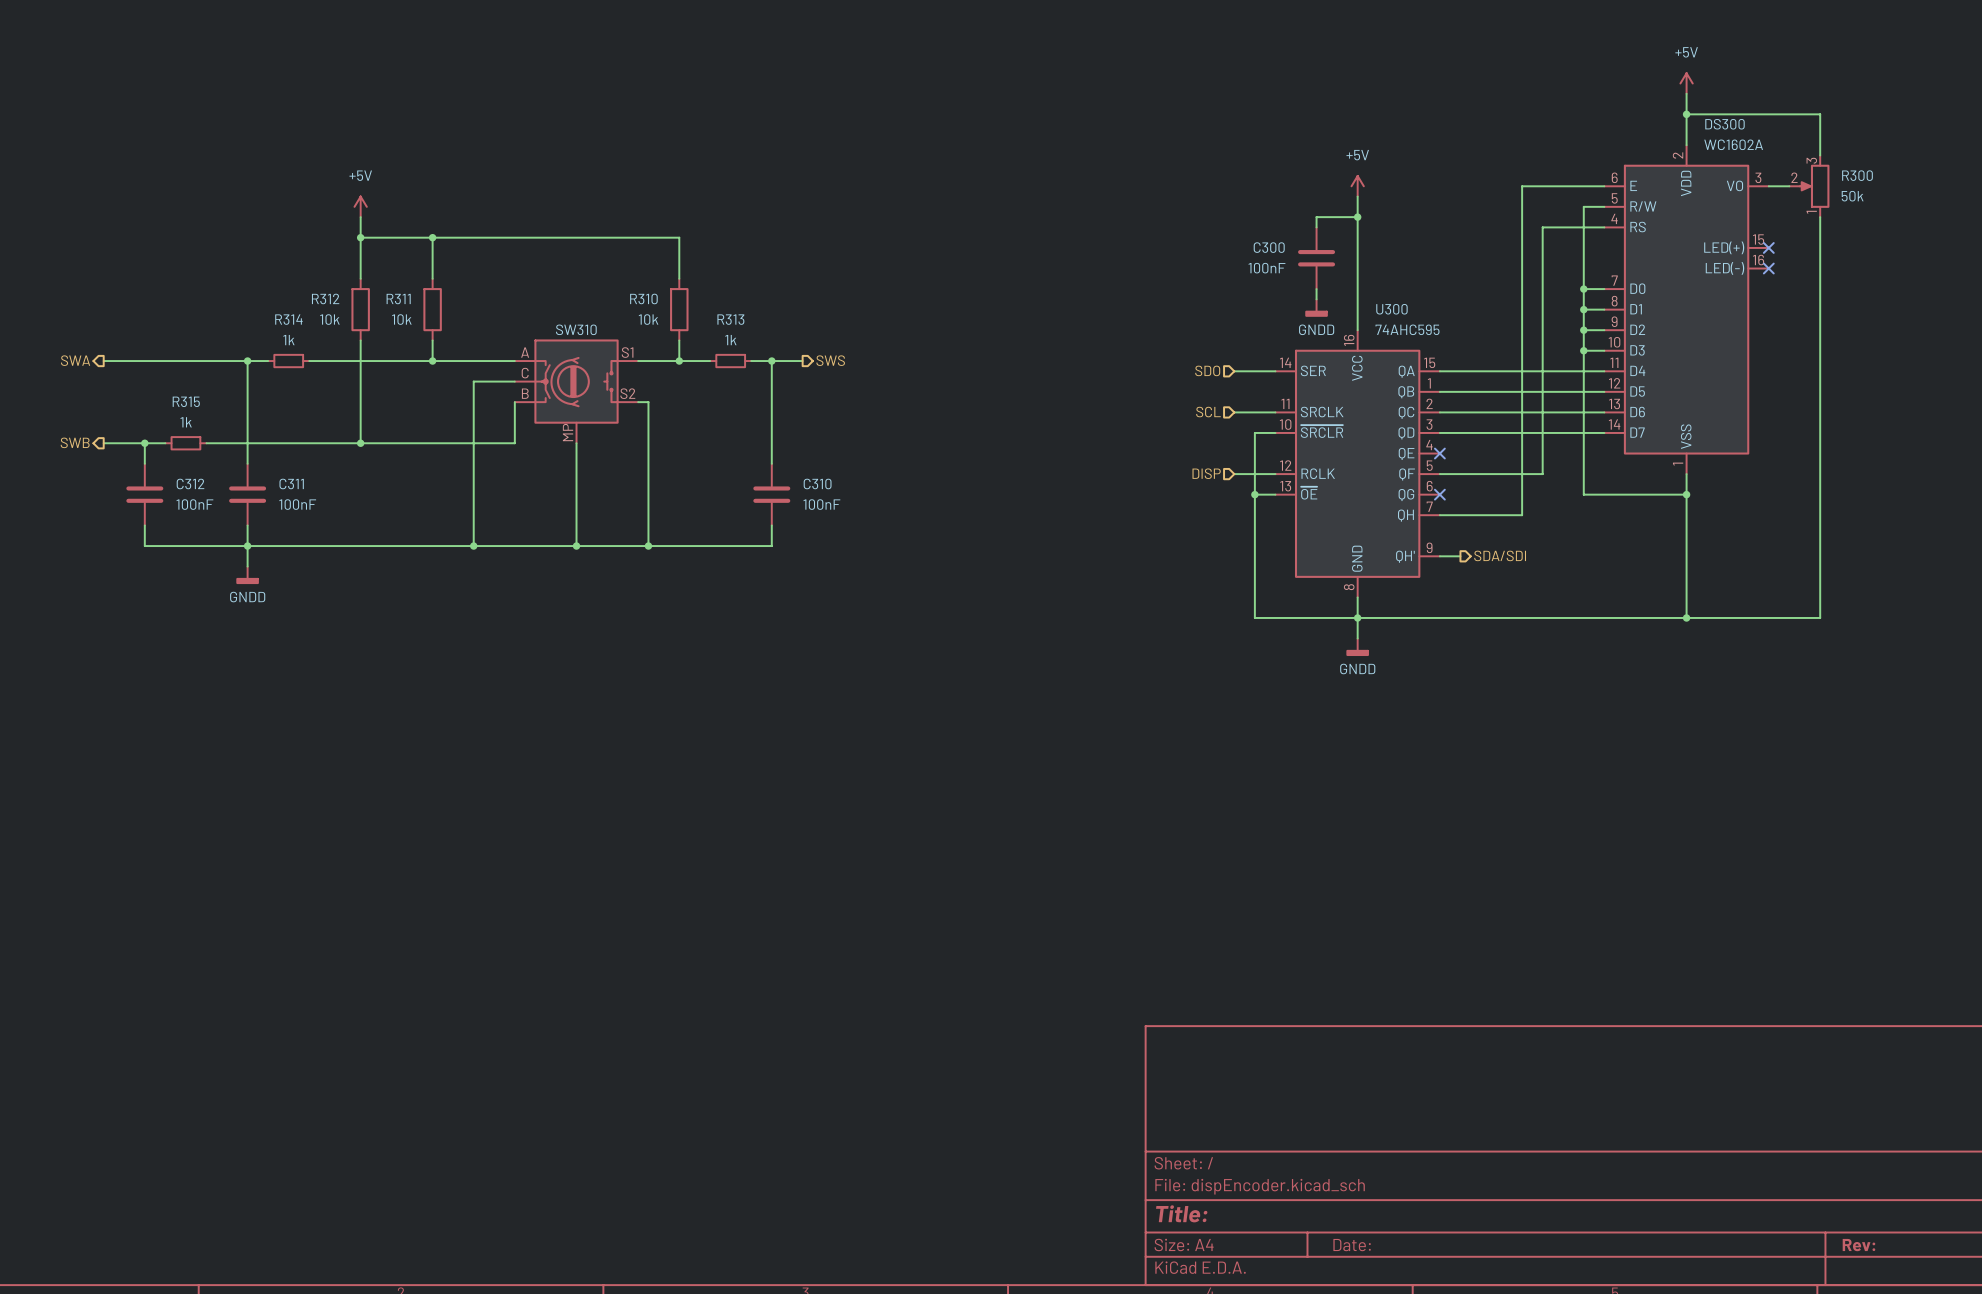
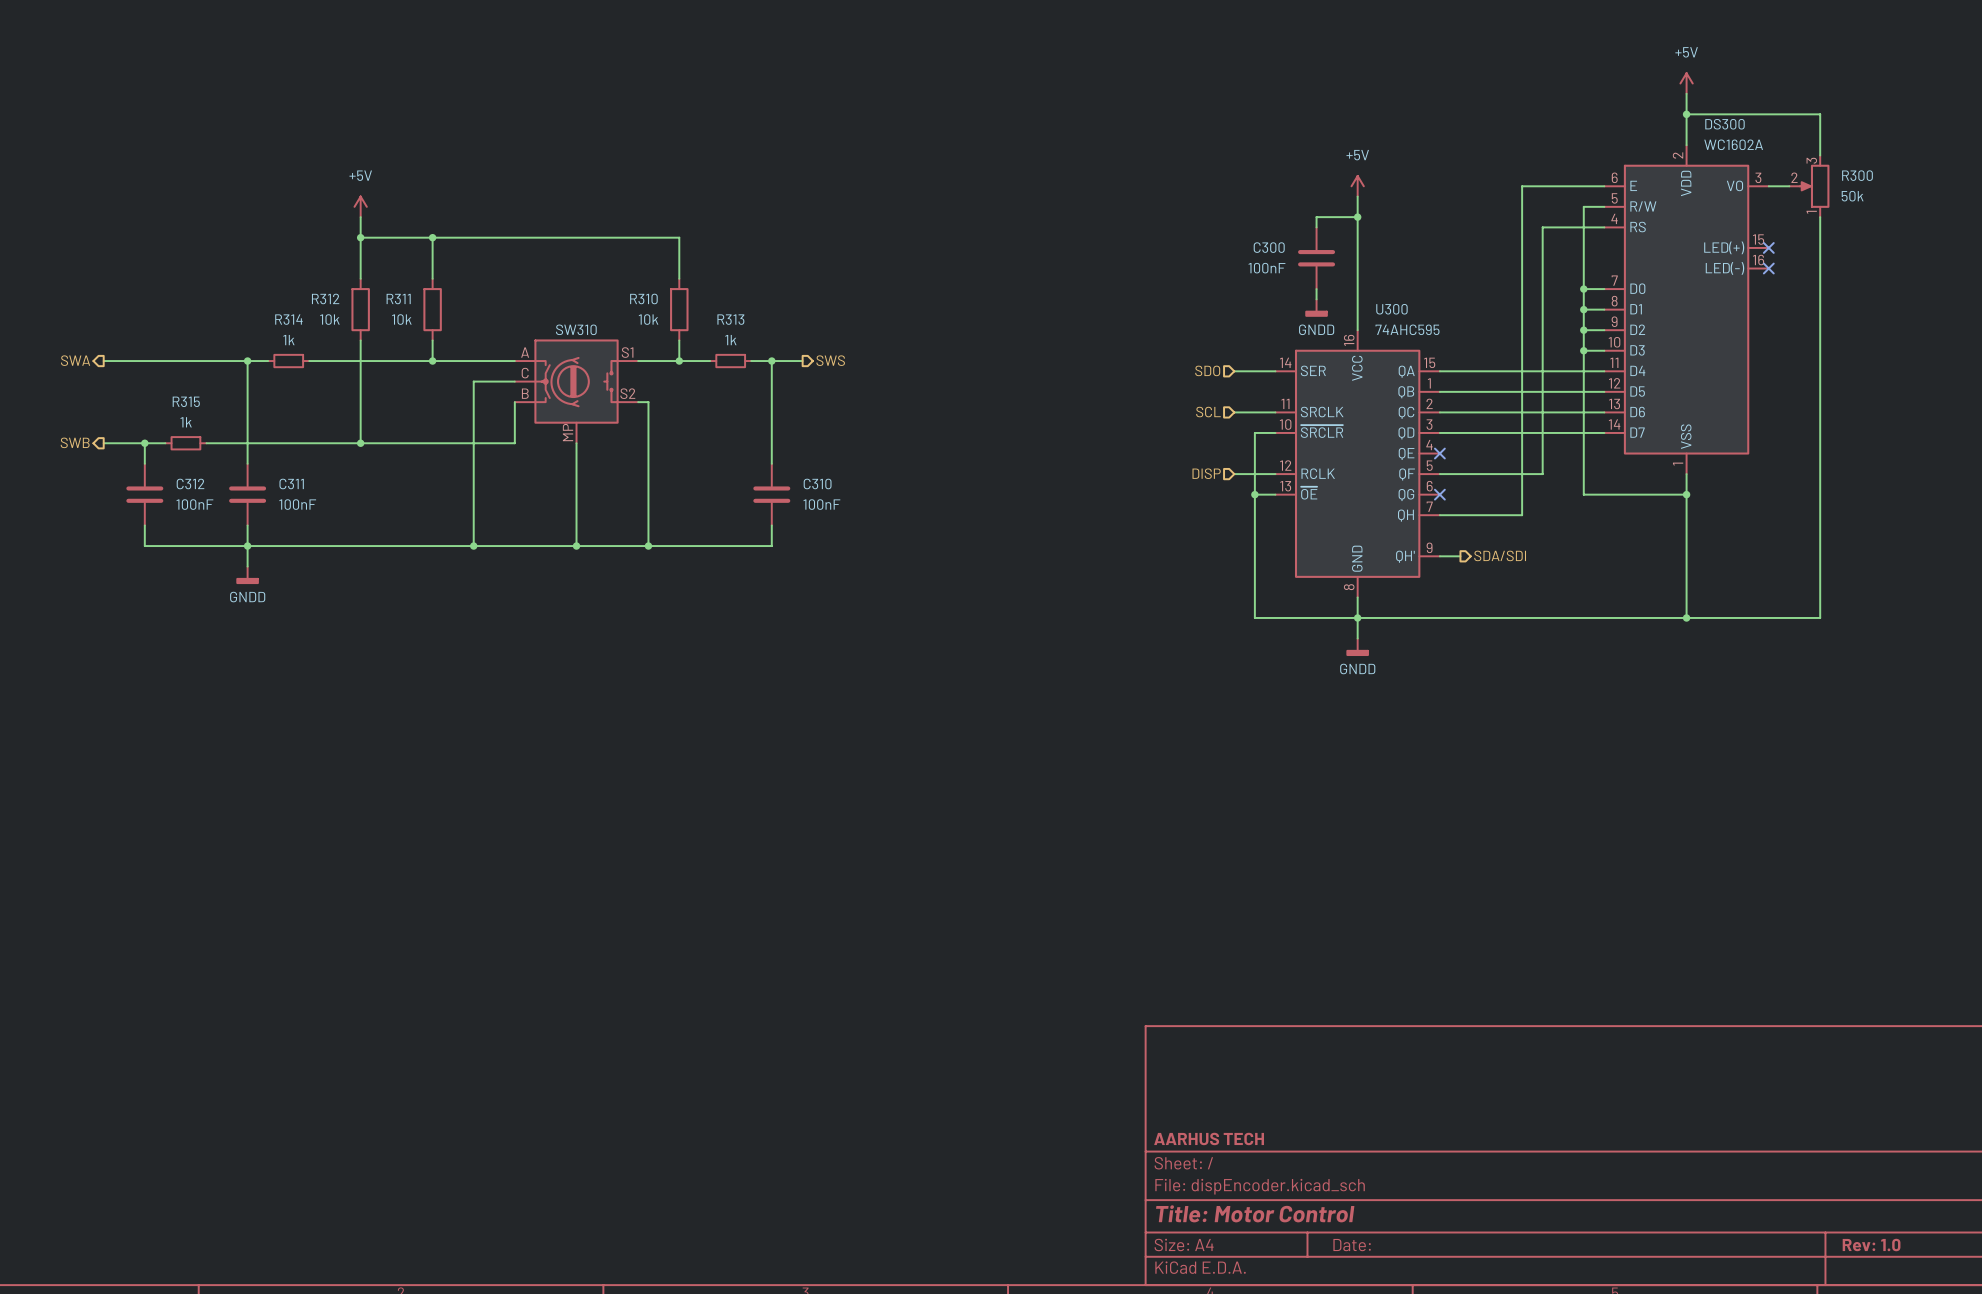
title block: none -> AARHUS TECH (1209, 1138)
title block: Title: (1181, 1213) -> Title: Motor Control (1255, 1213)
title block: Rev: (1858, 1245) -> Rev: 1.0 (1871, 1245)

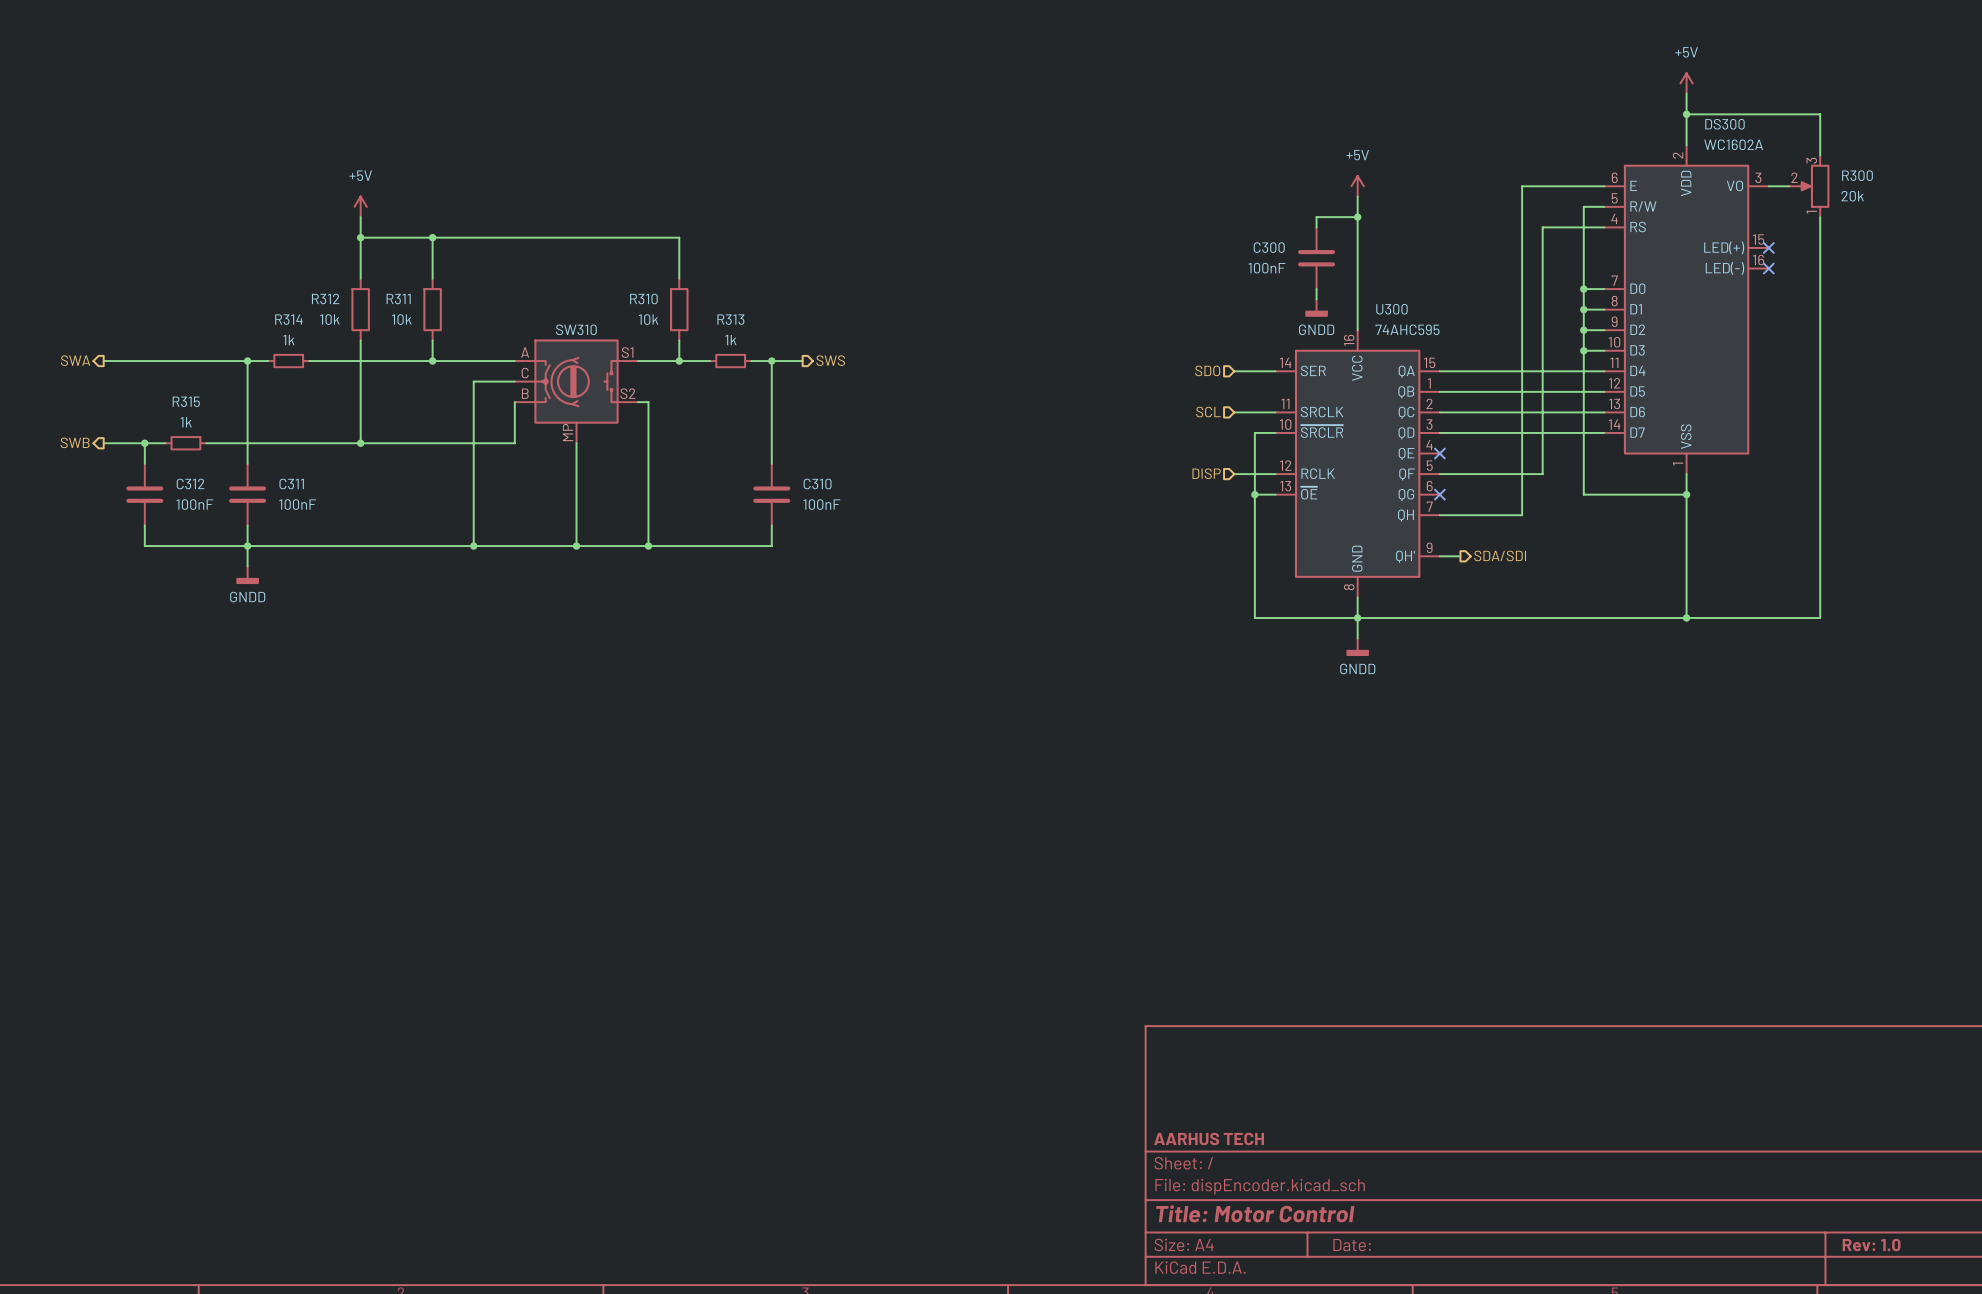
R300 value: 50k (1852, 196) -> 20k (1852, 196)

